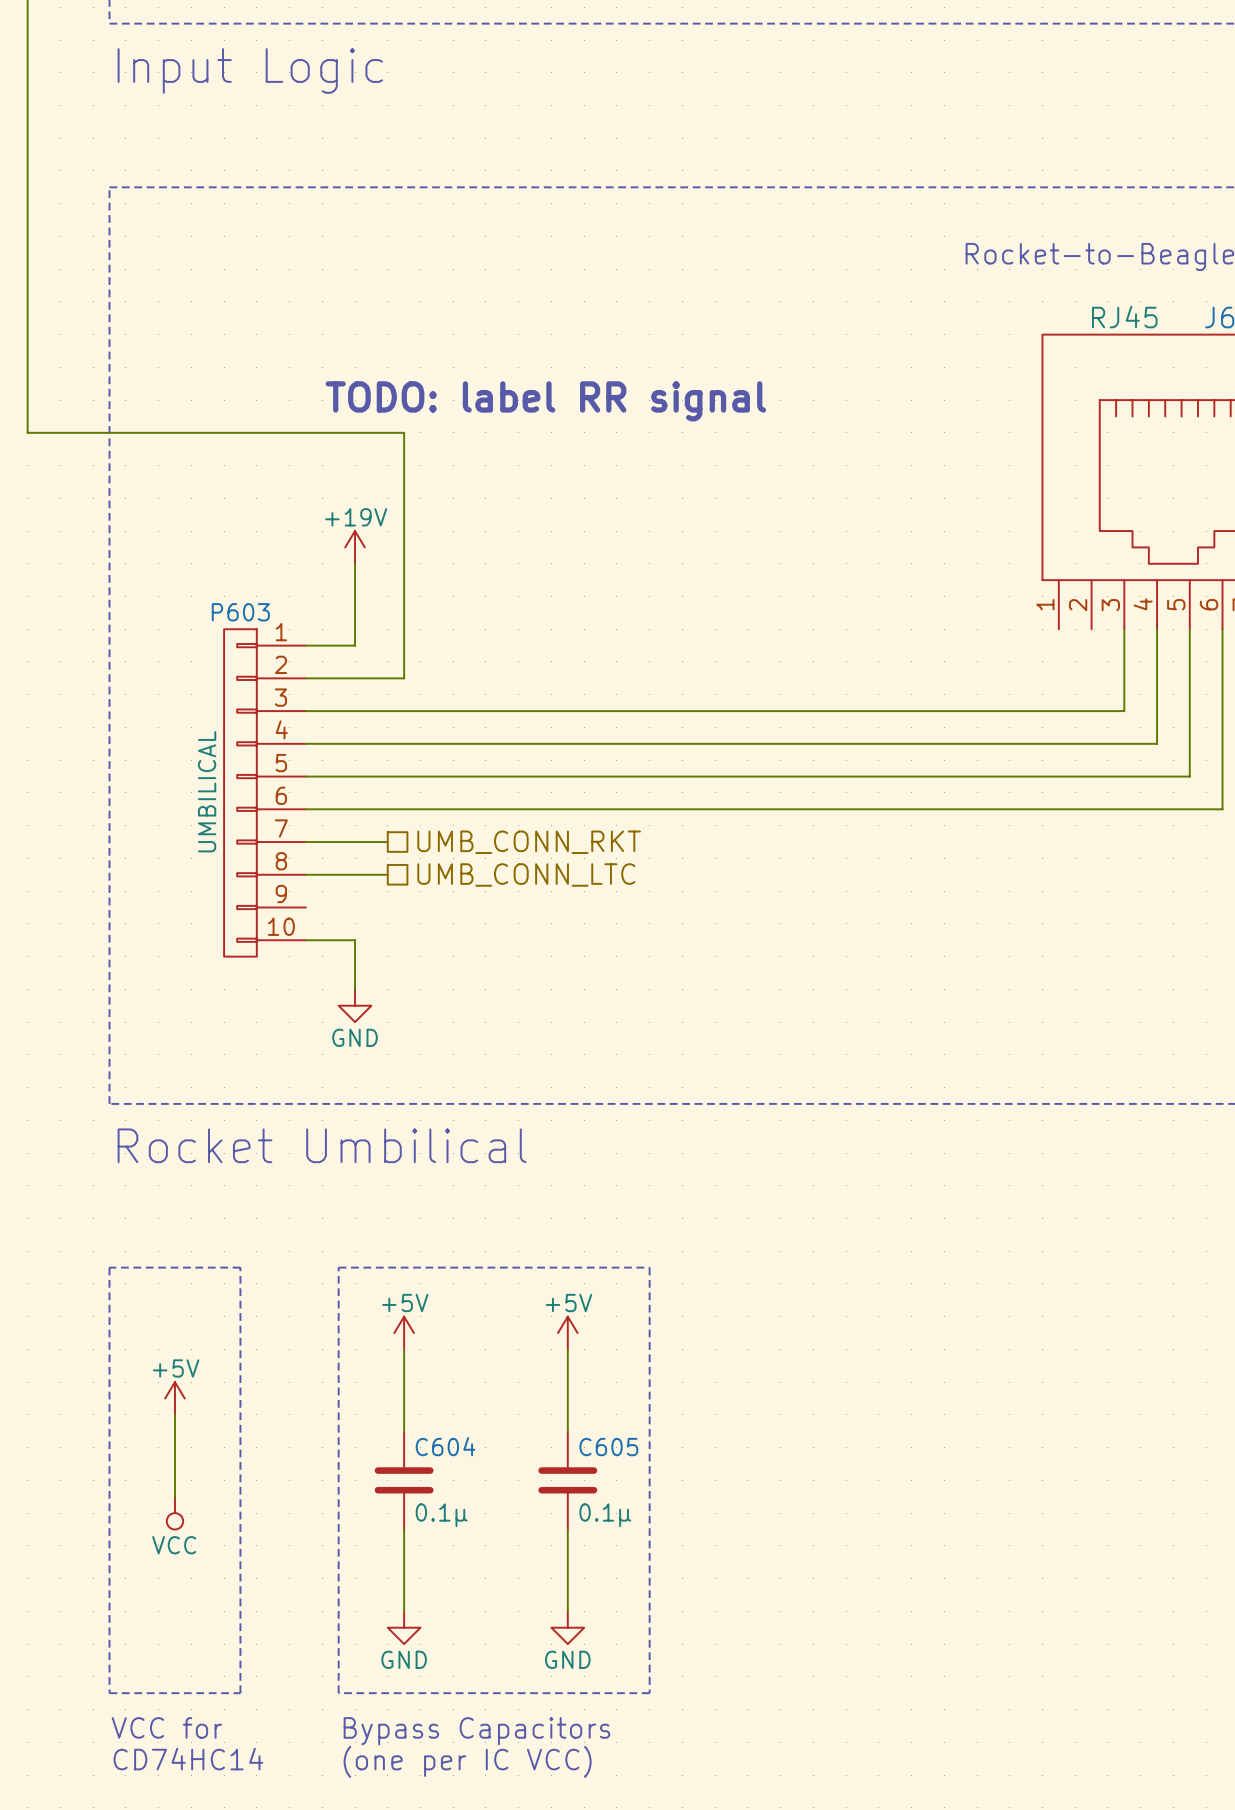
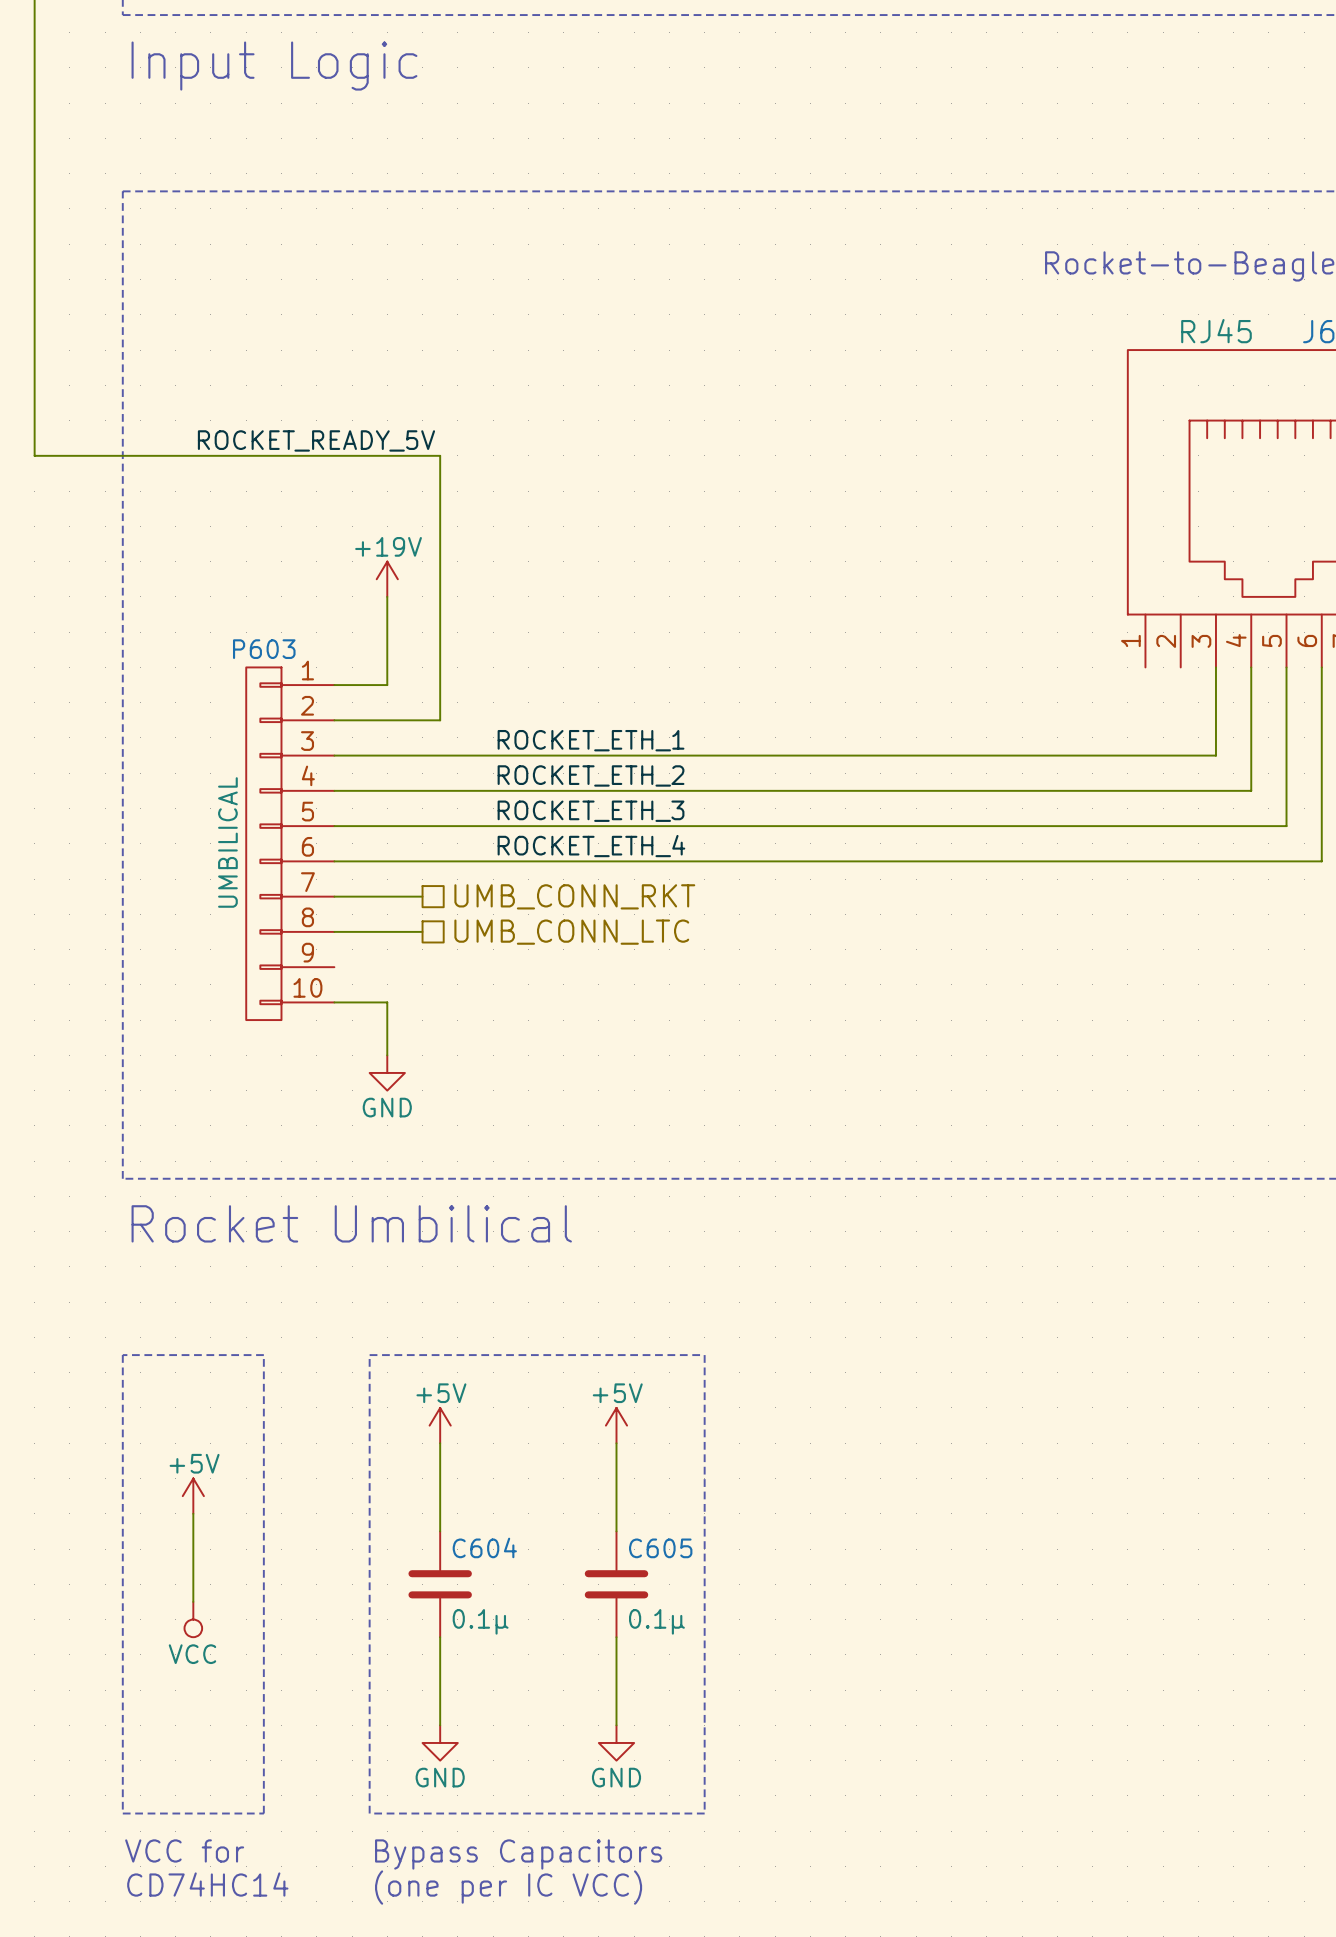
text: TODO: label RR signal (545, 401) -> none
label: none -> ROCKET_READY_5V (316, 440)
label: none -> ROCKET_ETH_1 (591, 740)
label: none -> ROCKET_ETH_2 (591, 775)
label: none -> ROCKET_ETH_3 (591, 811)
label: none -> ROCKET_ETH_4 (591, 846)

